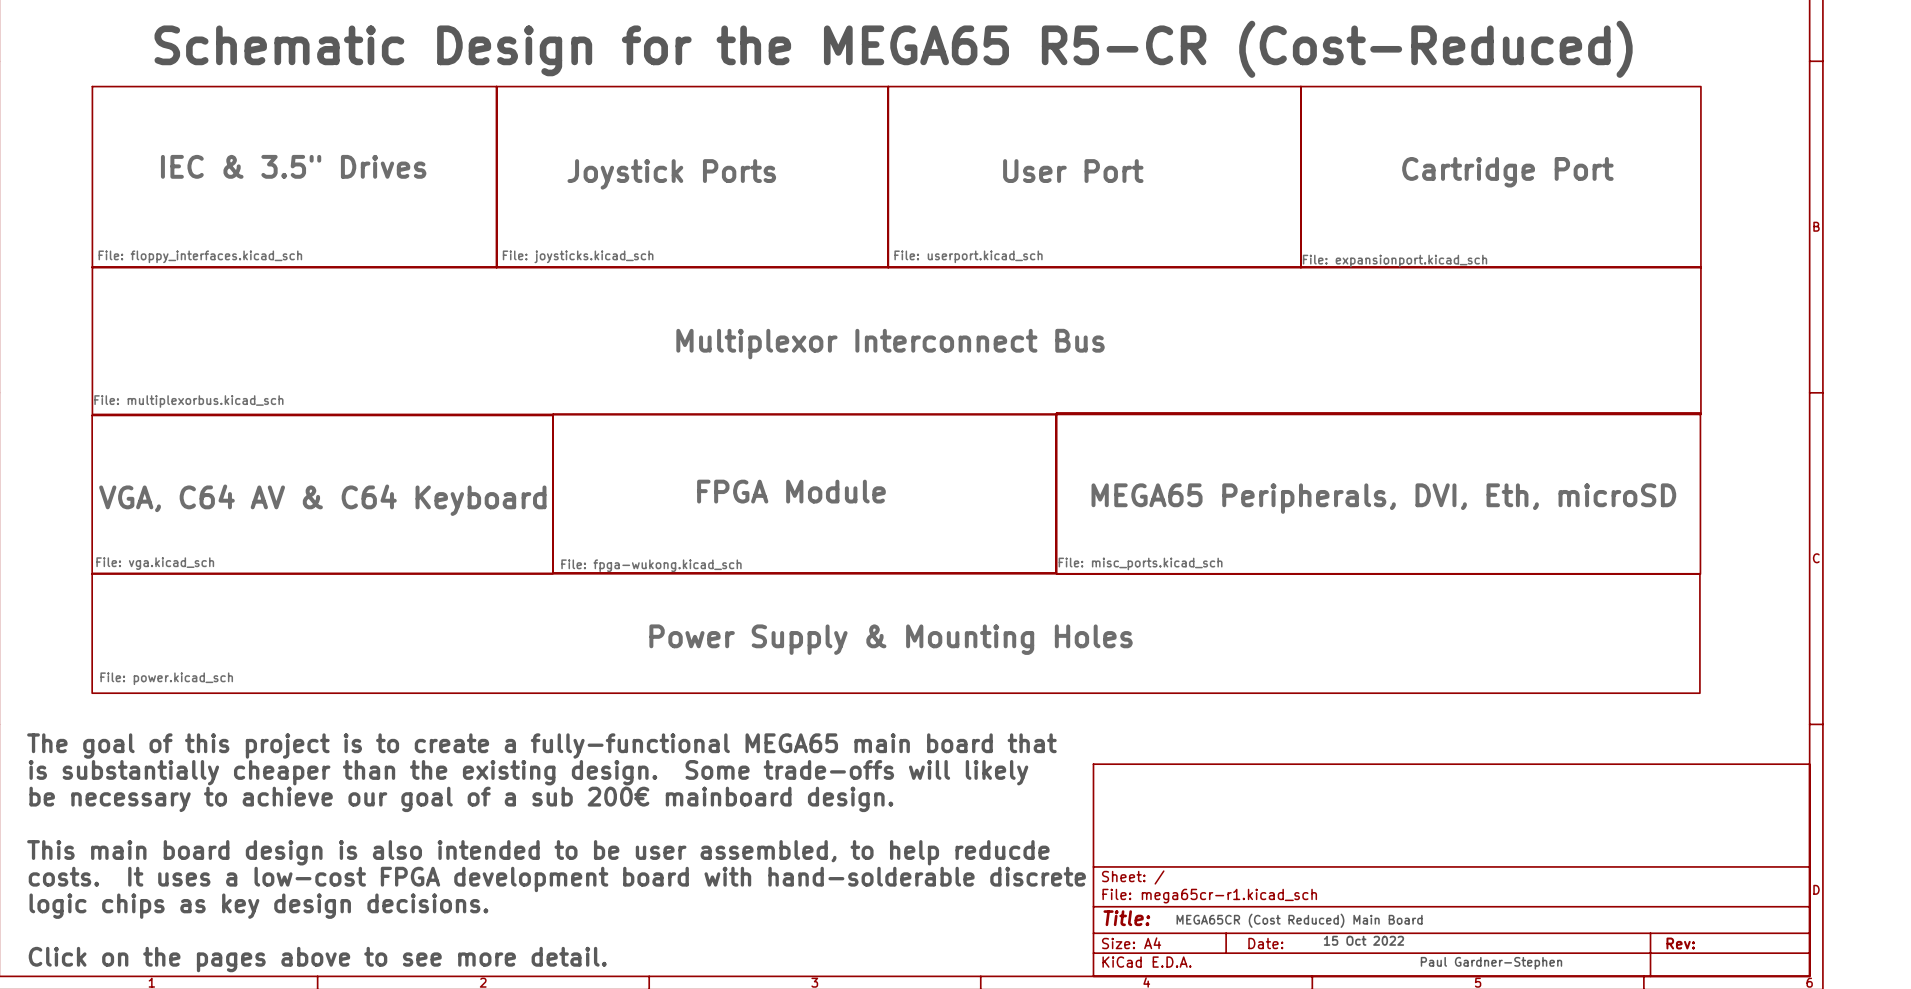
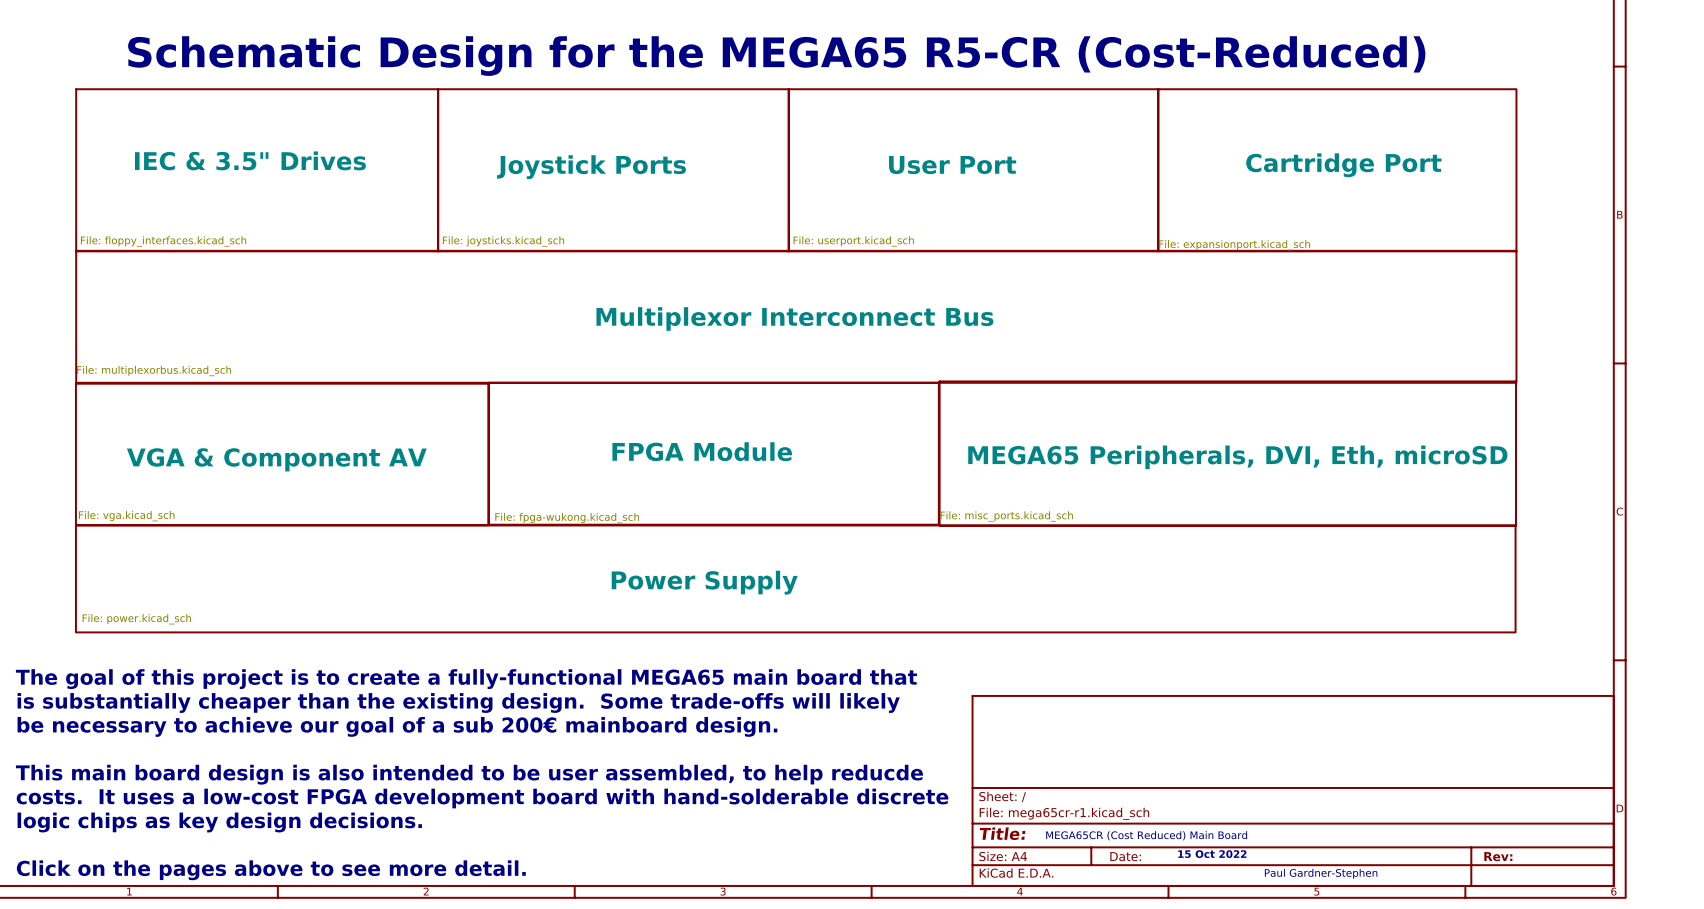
sheet VGA, C64 AV & C64 Keyboard name: VGA, C64 AV & C64 Keyboard (322, 500) -> VGA & Component AV (276, 459)
sheet Power Supply & Mounting Holes name: Power Supply & Mounting Holes (891, 639) -> Power Supply (704, 582)

